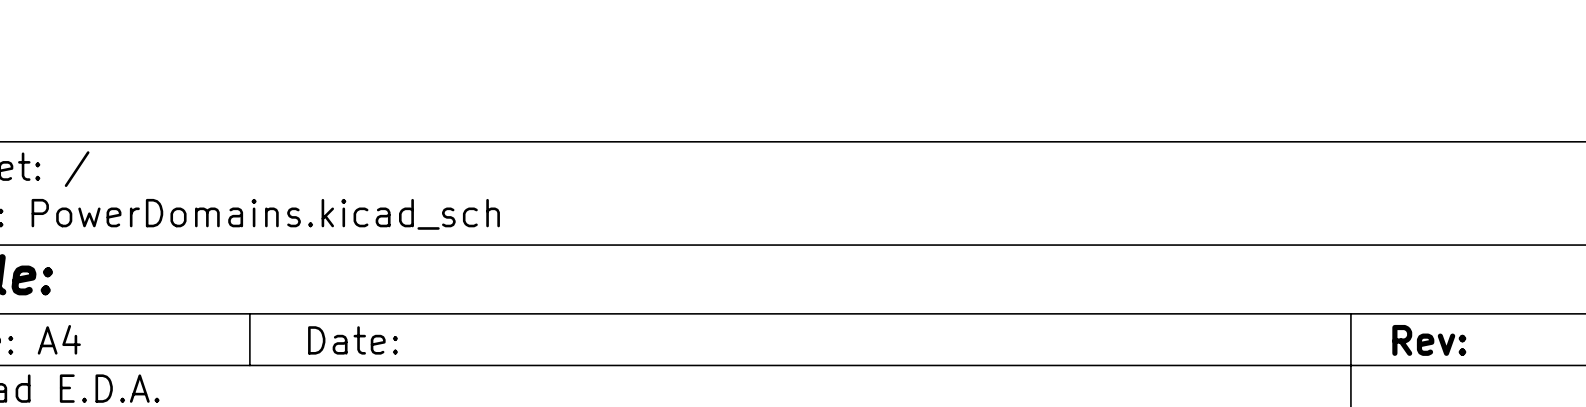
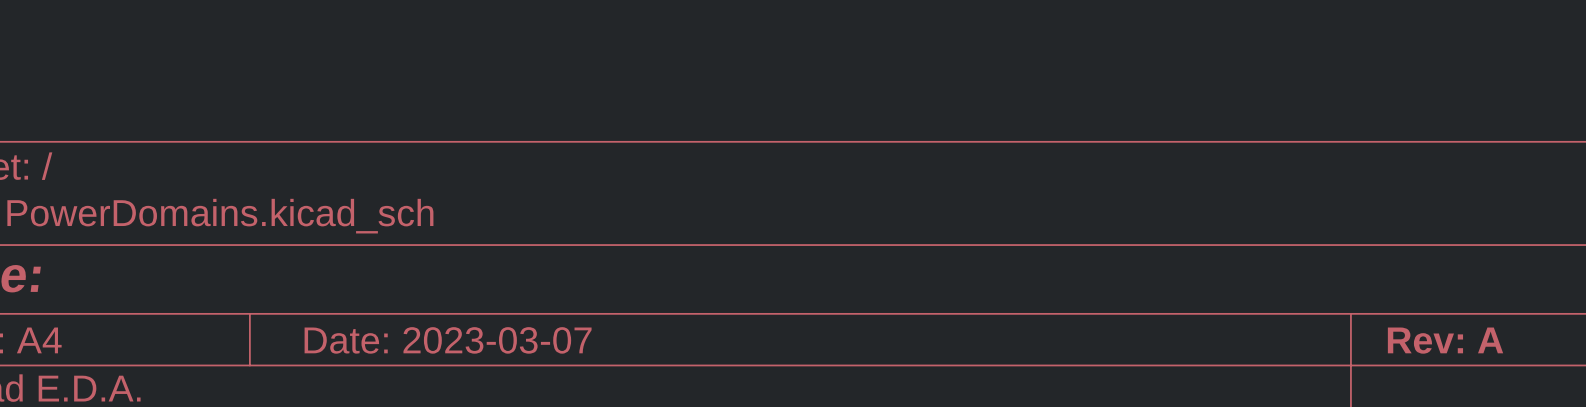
title block: Date: (353, 340) -> Date: 2023-03-07 (448, 340)
title block: Rev: (1429, 340) -> Rev: A (1445, 340)

